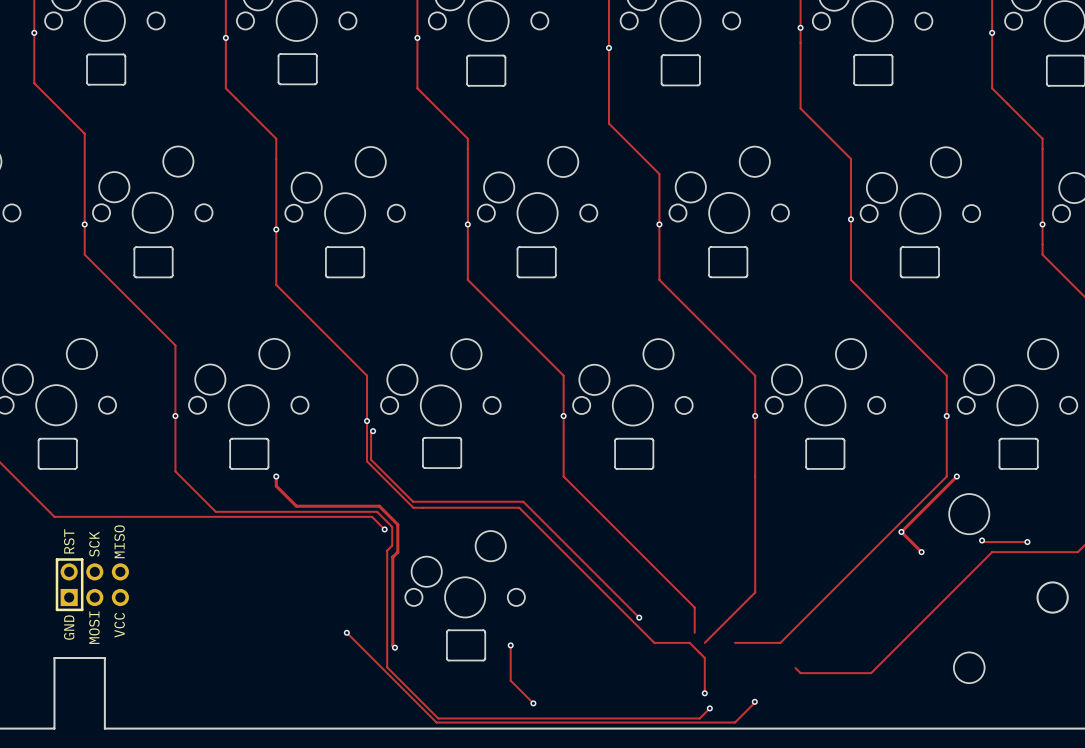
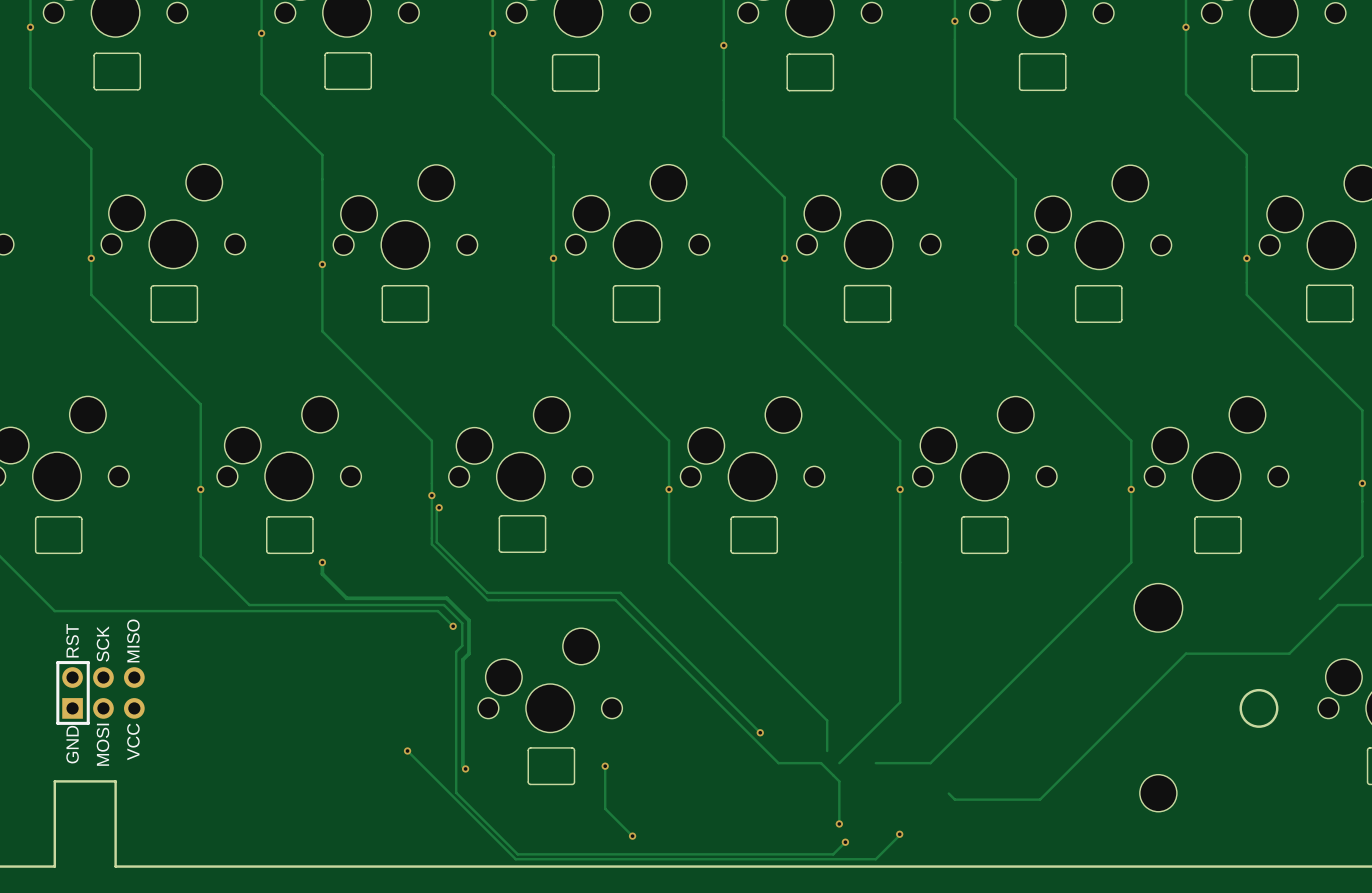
track: (956, 476) (901, 531) (921, 552) -> none
via: (956, 476) -> none
via: (901, 531) -> none
track: (982, 540) (1027, 542) -> none
via: (982, 540) -> none
via: (1027, 542) -> none
via: (921, 552) -> none

